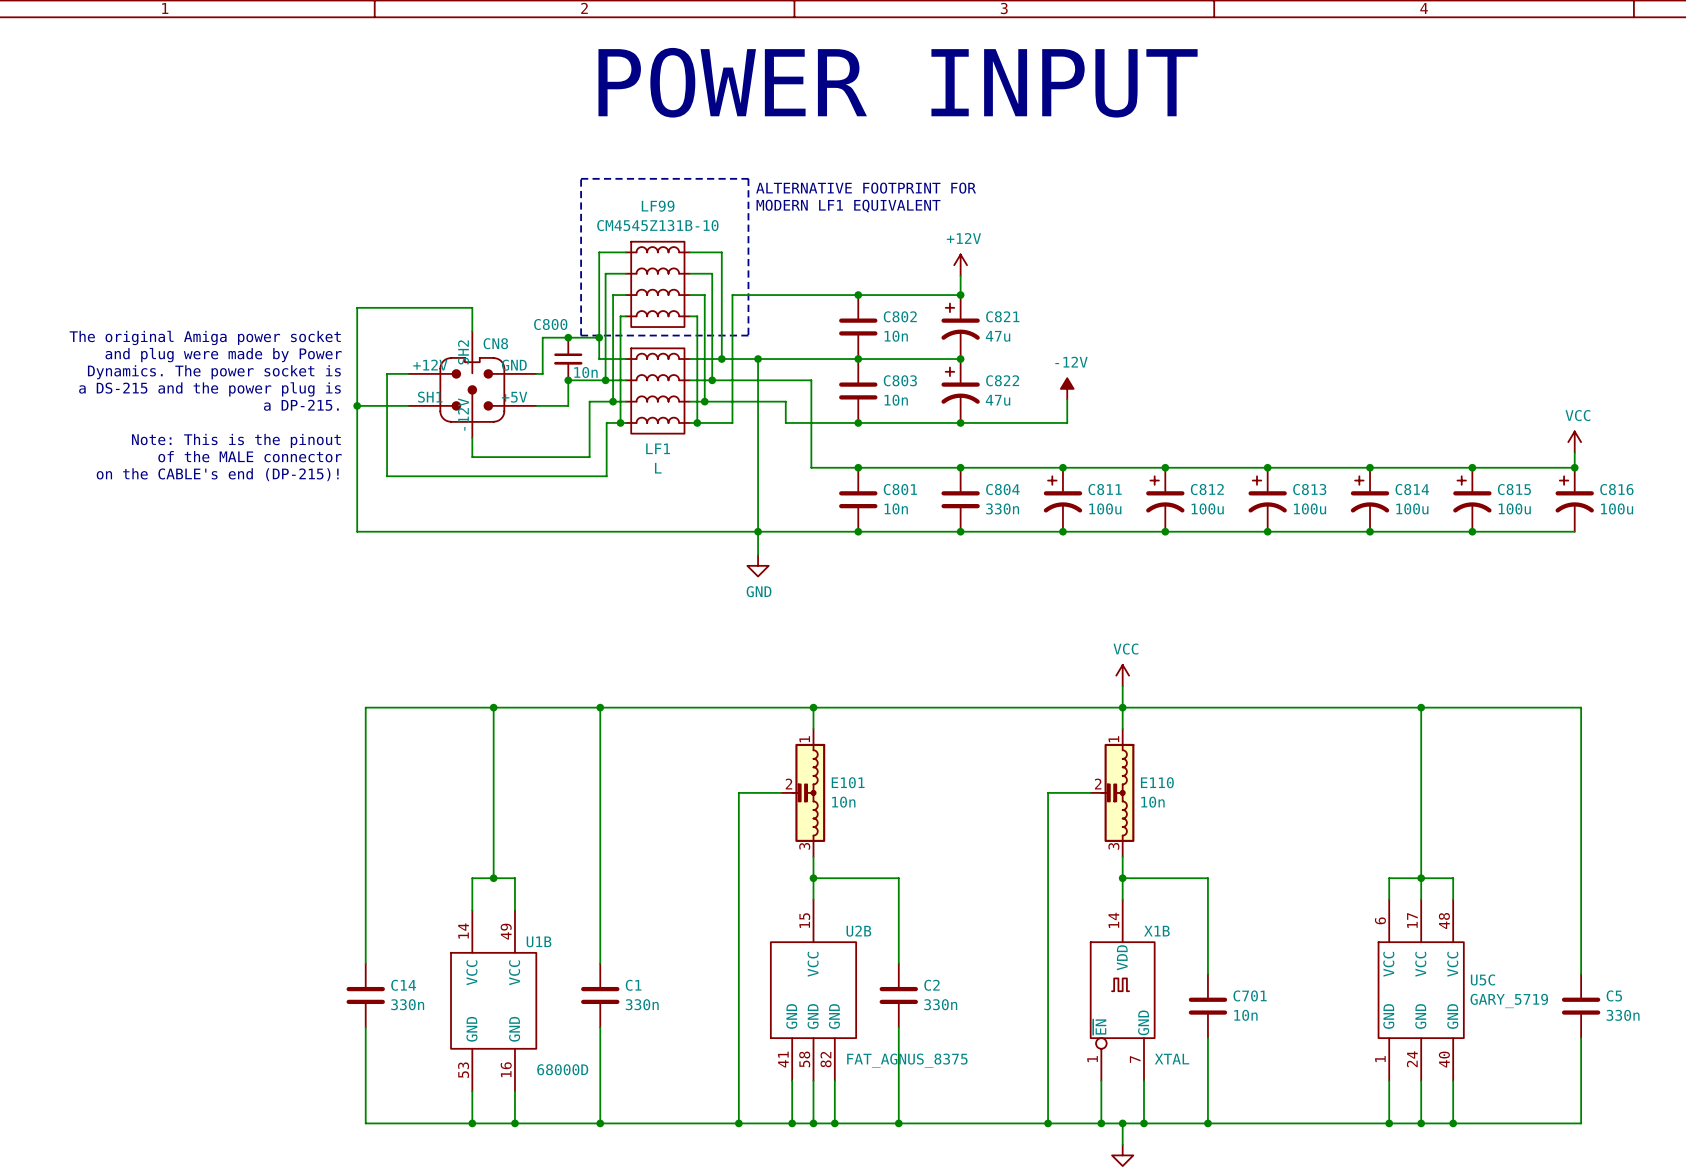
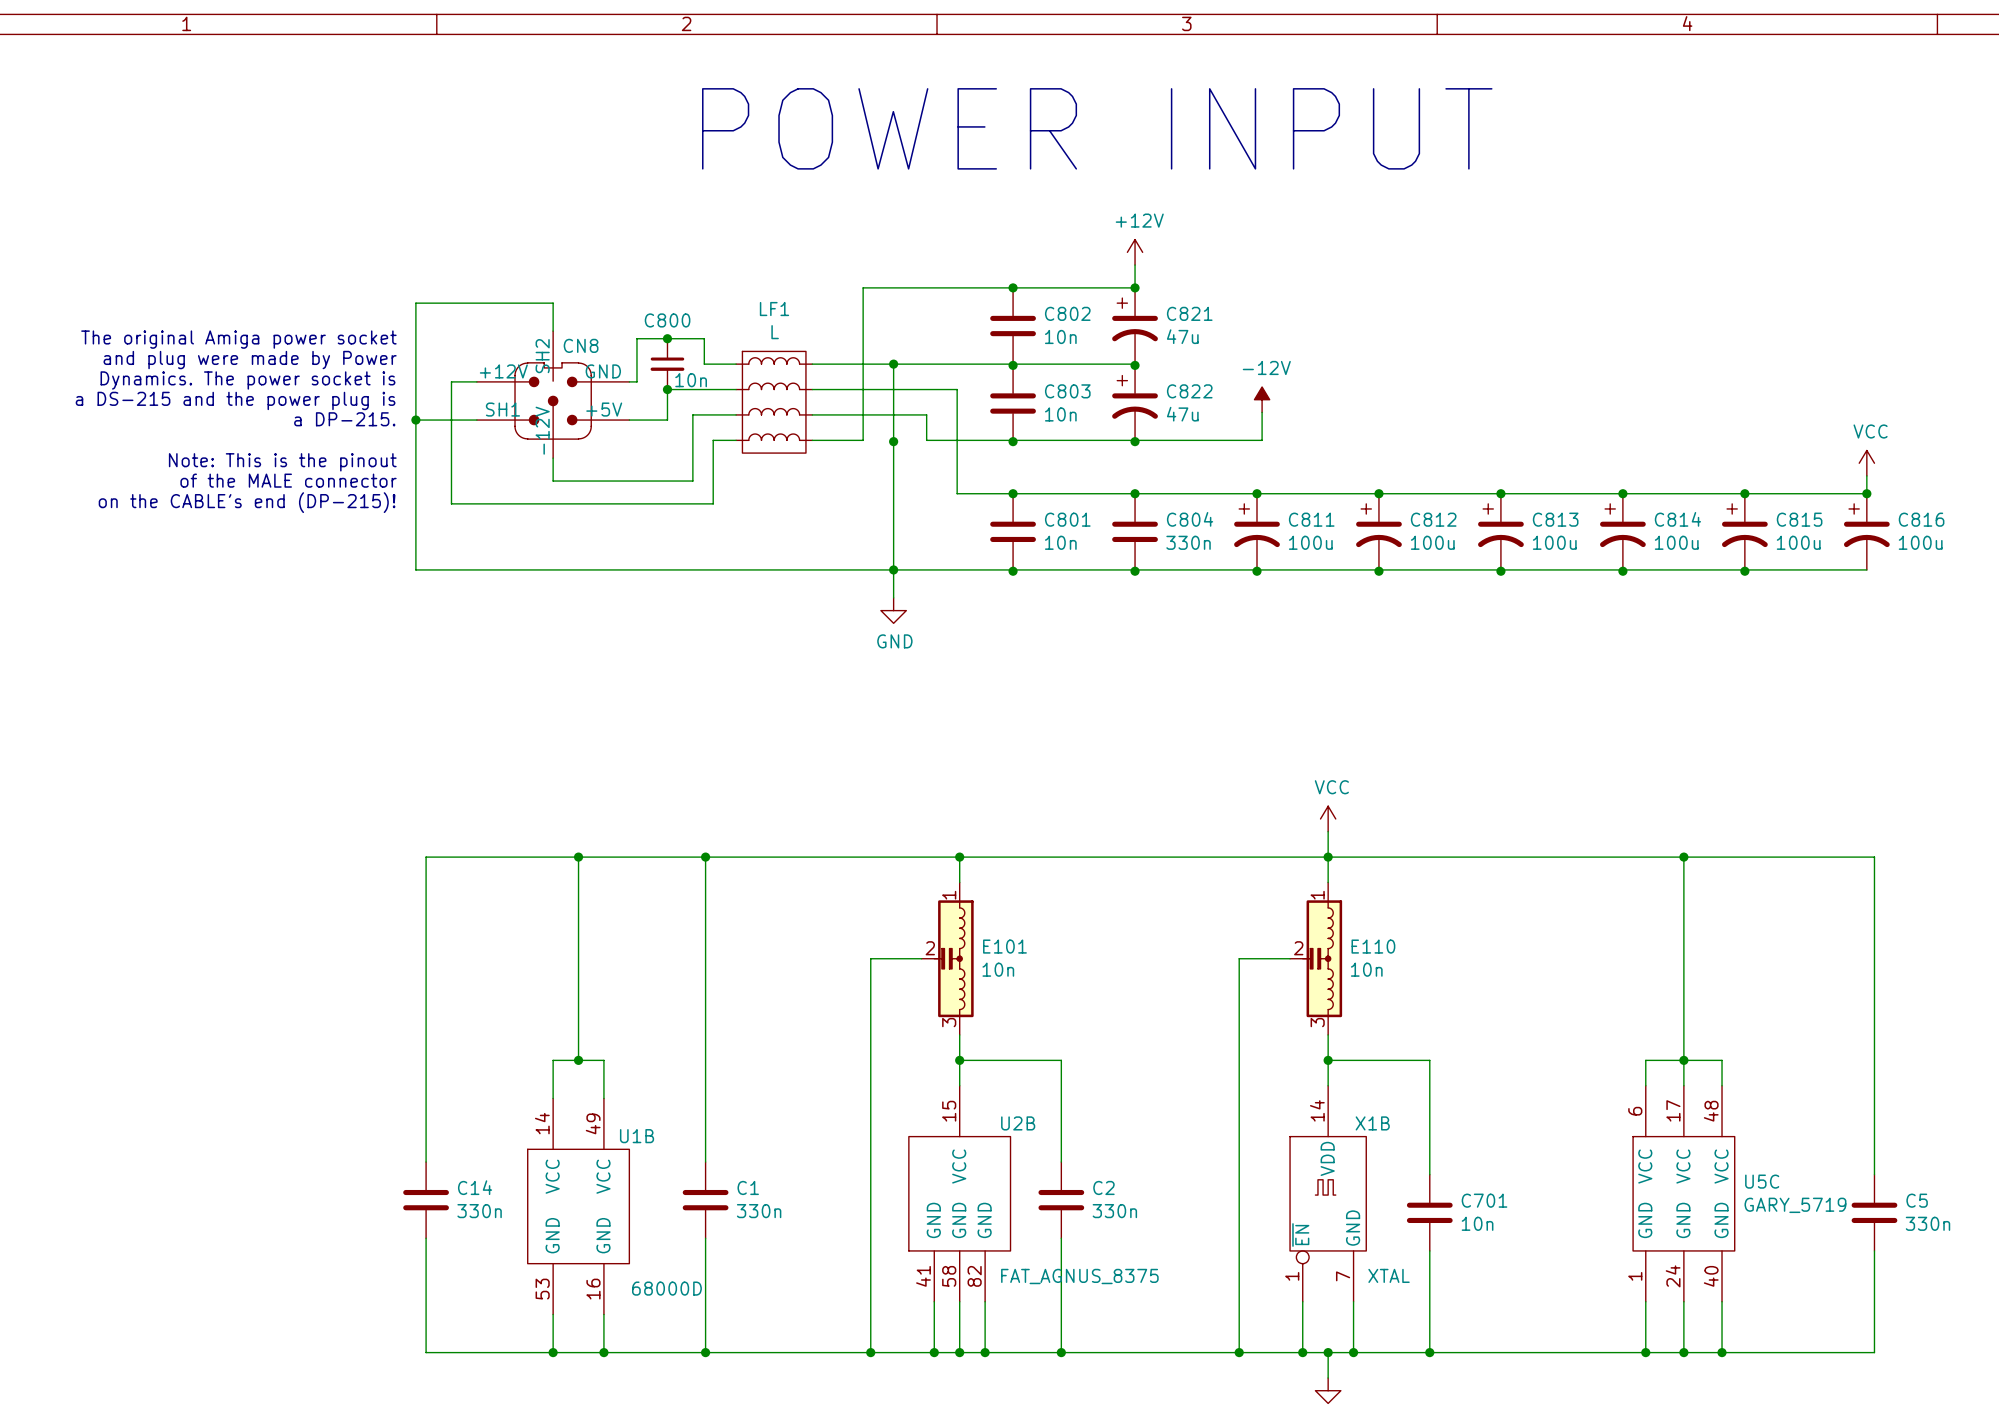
text position: POWER INPUT (898, 82) -> POWER INPUT (1097, 128)
line: (581, 178) (748, 178) (748, 335) (581, 335) (581, 178) -> none
text: ALTERNATIVE FOOTPRINT FOR (866, 188) -> none
text: MODERN LF1 EQUIVALENT (848, 206) -> none
junction: none -> (1013, 287)
junction: none -> (1135, 287)
wire: (625, 252) (599, 252) (599, 272) -> (629, 381) (636, 381) (636, 338) (704, 338)
wire: (689, 252) (721, 252) (721, 359) -> none
C802: none -> 10n (1013, 326)
C821: none -> 47u (1135, 326)
power symbol position: +12V (960, 265) -> +12V (1135, 252)
junction: none -> (667, 338)
wire: (625, 273) (605, 273) (605, 380) -> none
wire: (689, 273) (712, 273) (712, 380) -> none
wire: (960, 275) (960, 295) (732, 295) -> (1135, 265) (1135, 287) (863, 287) (863, 365)
LF99: CM4545Z131B-10 (657, 284) -> none
wire: (599, 293) (599, 359) (625, 359) -> (704, 364) (736, 364)
junction: none -> (893, 364)
wire: (625, 295) (613, 295) (613, 401) -> none
wire: (689, 295) (704, 295) (704, 401) -> none
wire: (357, 307) (472, 307) (472, 331) -> (415, 380) (415, 303) (553, 303) (553, 331)
junction: none -> (667, 389)
wire: (625, 316) (620, 316) (620, 422) -> none
wire: (689, 316) (697, 316) (697, 422) -> none
C802 name: C802 (900, 316) -> C803 (1067, 391)
C821 name: C821 (1002, 316) -> C822 (1189, 391)
C800 name position: C800 (550, 324) -> C800 (667, 320)
text position: The original Amiga power socket (205, 337) -> The original Amiga power socket (238, 339)
junction: (568, 337) -> none
wire: (599, 337) (542, 337) (542, 373) (536, 373) -> none
junction: (599, 337) -> none
junction: none -> (415, 420)
text position: and plug were made by Power (223, 355) -> and plug were made by Power (250, 360)
wire: (732, 357) (732, 422) (689, 422) -> (863, 440) (812, 440)
C800 position: (568, 359) -> (667, 364)
wire: (689, 359) (960, 359) -> (812, 364) (1135, 364)
junction: (721, 359) -> none
text position: Dynamics. The power socket is (214, 372) -> Dynamics. The power socket is (247, 380)
wire: (387, 373) (408, 373) -> (451, 459) (451, 381) (476, 381)
junction: (568, 380) -> none
junction: (605, 380) -> none
wire: (625, 380) (568, 380) (568, 405) (536, 405) -> (736, 389) (667, 389) (667, 420) (629, 420)
wire: (689, 380) (811, 380) -> (812, 389) (957, 389) (957, 467)
junction: (712, 380) -> none
CN8 position: (472, 384) -> (553, 394)
power symbol position: -12V (1067, 388) -> -12V (1262, 399)
text position: a DS-215 and the power plug is (209, 389) -> a DS-215 and the power plug is (235, 400)
LF1 position: (657, 390) -> (774, 402)
C803: 10n (858, 390) -> none
C822: 47u (960, 390) -> none
wire: (1067, 399) (1067, 422) (785, 422) (785, 401) (689, 401) -> (1262, 412) (1262, 440) (926, 440) (926, 414) (812, 414)
junction: (613, 401) -> none
wire: (625, 401) (589, 401) (589, 457) (472, 457) (472, 437) -> (736, 414) (692, 414) (692, 481) (553, 481) (553, 458)
junction: (704, 401) -> none
wire: (811, 402) (811, 467) (1574, 467) (1574, 452) -> (957, 493) (1866, 493) (1866, 475)
junction: none -> (1256, 493)
junction: none -> (1378, 493)
junction: none -> (1500, 493)
junction: none -> (1622, 493)
junction: none -> (1744, 493)
junction: none -> (1866, 493)
text position: a DP-215. (301, 405) -> a DP-215. (344, 419)
wire: (357, 405) (408, 405) -> (415, 420) (476, 420)
junction: (357, 405) -> none
wire: (387, 411) (387, 476) (606, 476) (606, 422) (625, 422) -> (451, 503) (713, 503) (713, 440) (736, 440)
junction: (620, 422) -> none
junction: (697, 422) -> none
junction position: (858, 422) -> (1013, 493)
junction position: (960, 422) -> (1135, 493)
text position: Note: This is the pinout (236, 440) -> Note: This is the pinout (282, 462)
power symbol position: VCC (1574, 442) -> VCC (1866, 463)
LF1 name position: LF1 (658, 448) -> LF1 (774, 309)
text position: of the MALE connector (250, 456) -> of the MALE connector (288, 480)
wire: (357, 466) (357, 531) (1574, 531) -> (415, 569) (1866, 569)
junction: none -> (893, 569)
junction: (1574, 467) -> none
LF1 value position: L (658, 468) -> L (775, 332)
text position: on the CABLE's end (DP-215)! (217, 474) -> on the CABLE's end (DP-215)! (247, 502)
wire: (758, 490) (758, 555) -> (893, 364) (893, 441)
C801 position: (858, 499) -> (1013, 531)
C804 position: (960, 499) -> (1135, 531)
C811 position: (1062, 499) -> (1256, 531)
C812 position: (1165, 499) -> (1378, 531)
C813 position: (1267, 499) -> (1500, 531)
C814 position: (1370, 499) -> (1622, 531)
C815 position: (1472, 499) -> (1744, 531)
C816 position: (1574, 499) -> (1866, 531)
junction: (758, 531) -> none
junction: (858, 531) -> none
junction: (960, 531) -> none
junction: (1062, 531) -> none
junction: (1165, 531) -> none
junction: (1267, 531) -> none
junction: (1370, 531) -> none
junction: (1472, 531) -> none
power symbol position: GND (758, 565) -> GND (893, 610)

